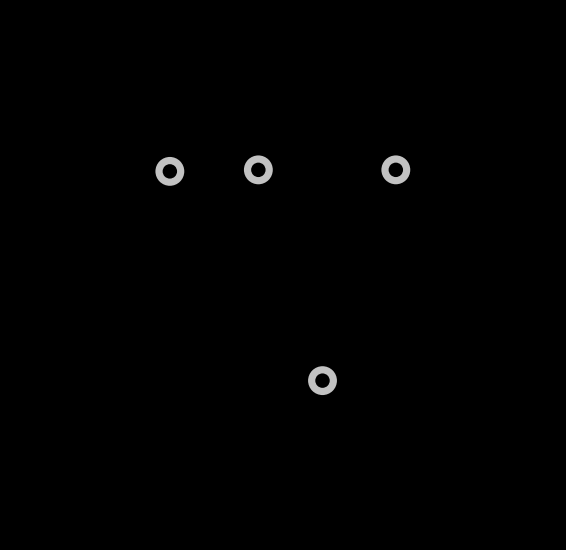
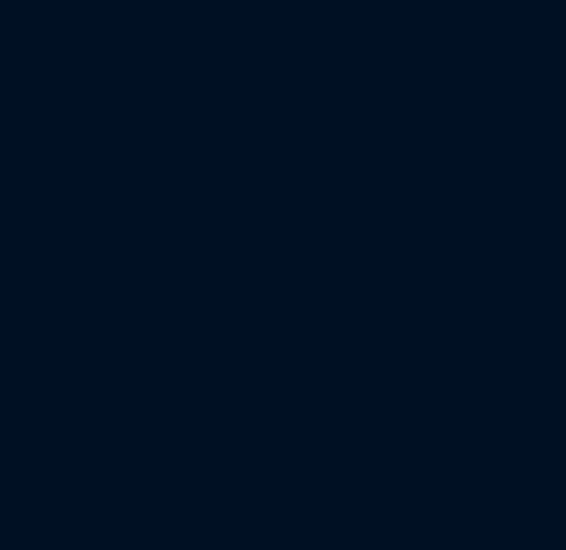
via: (258, 169) -> none
via: (395, 169) -> none
via: (169, 171) -> none
via: (322, 380) -> none

